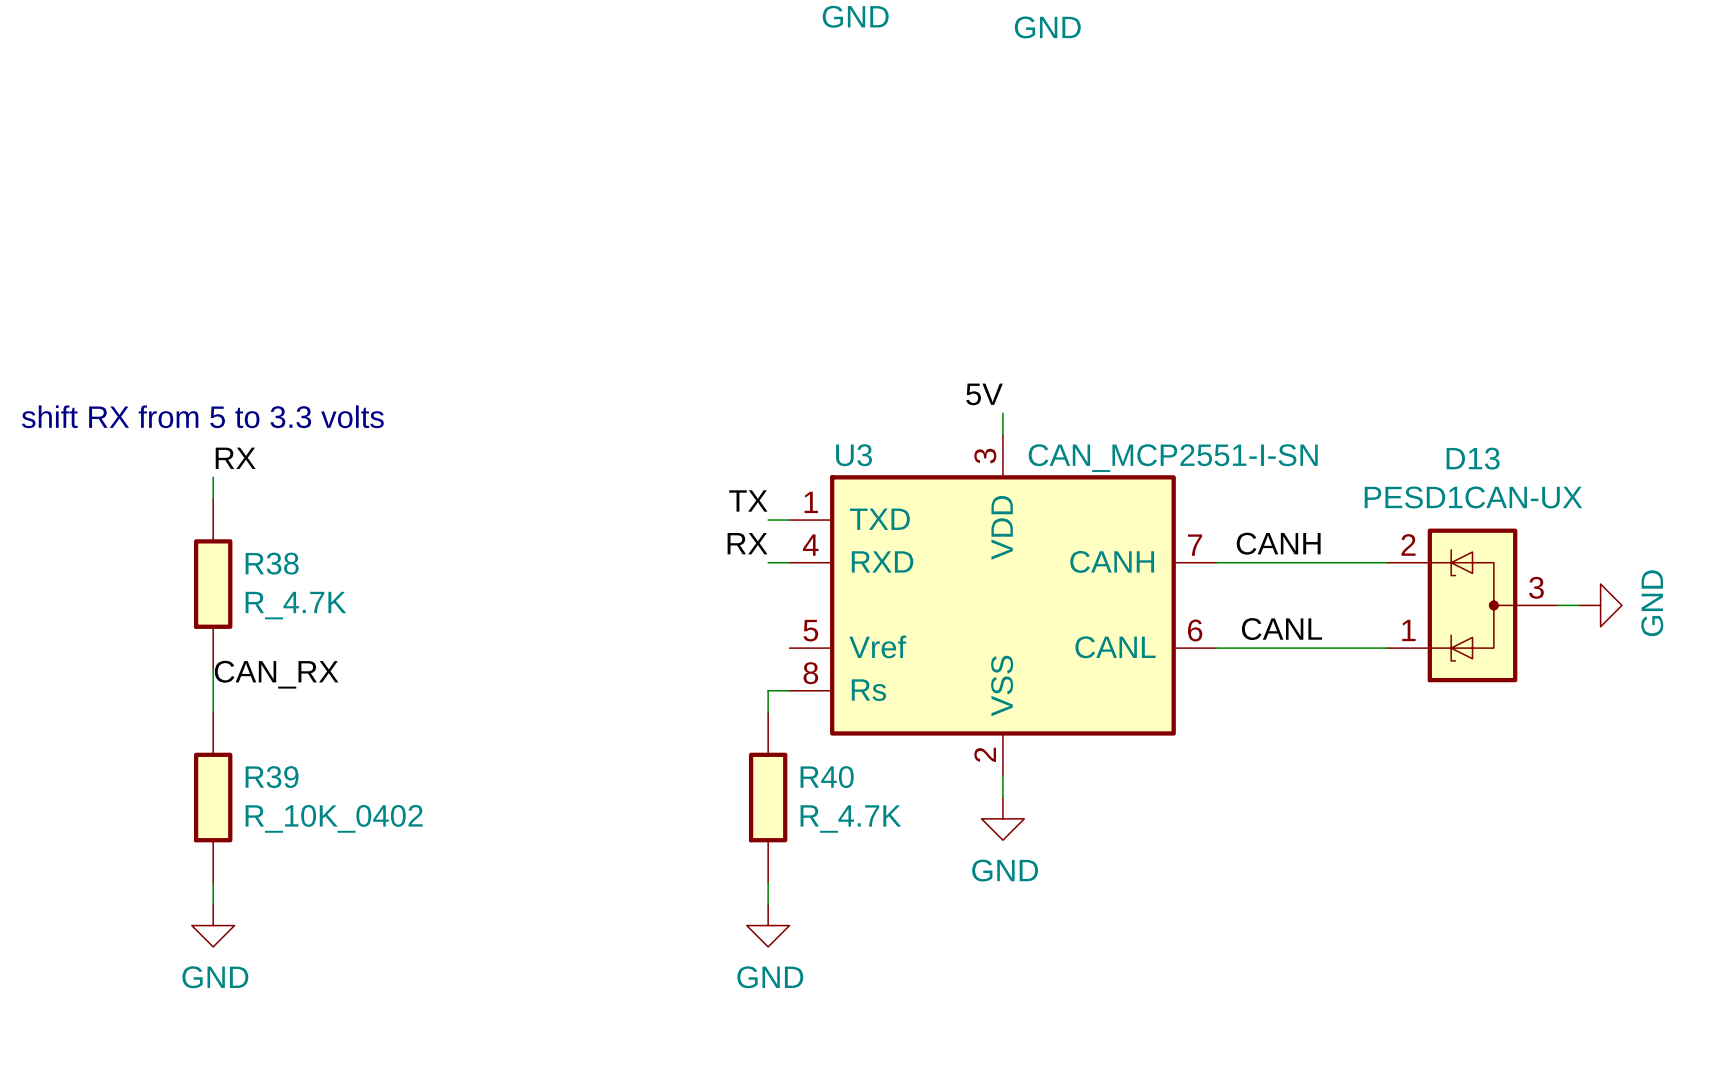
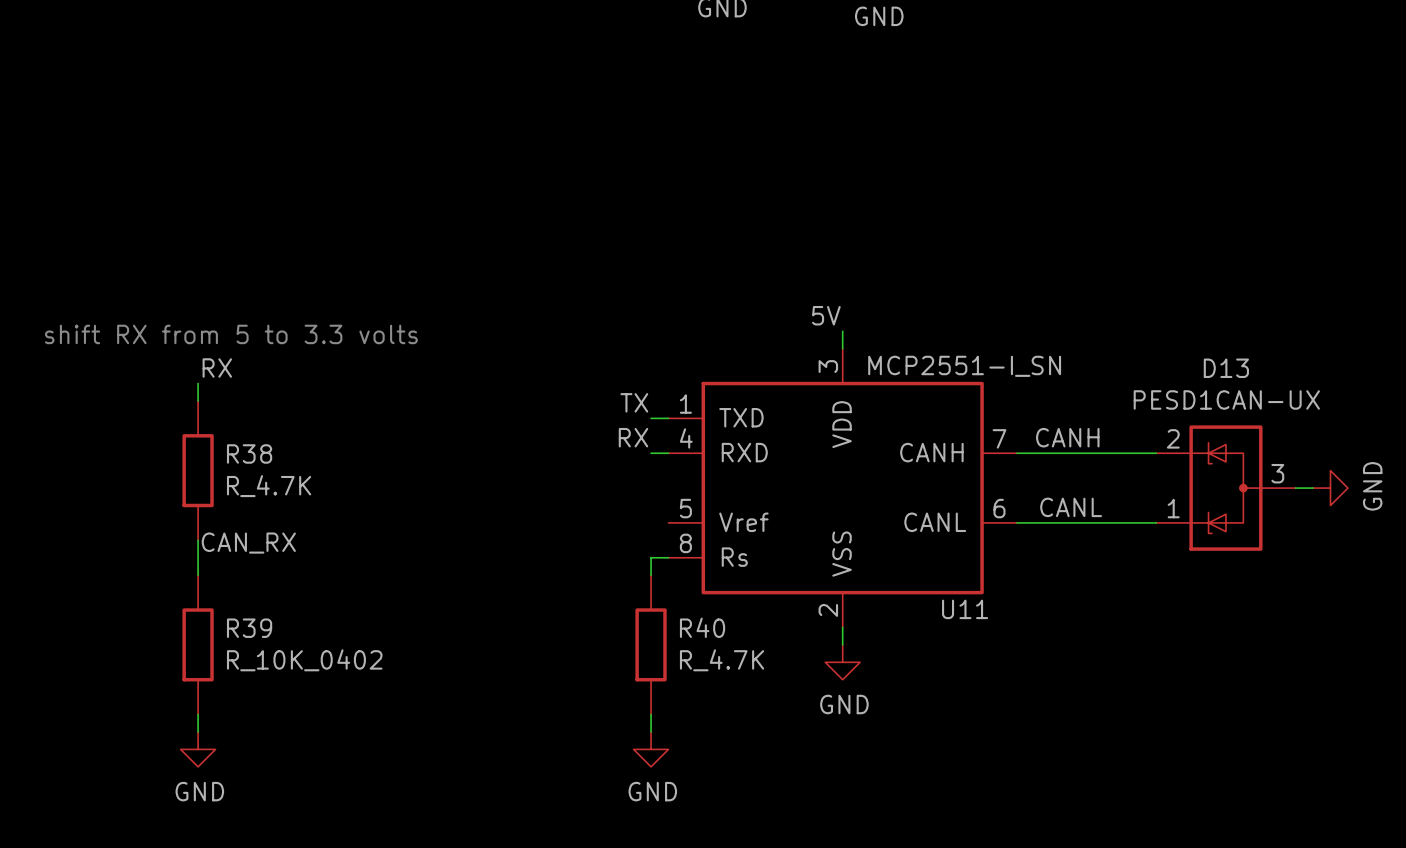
U3 name: U3 (854, 455) -> U11 (965, 609)
U3 value: CAN_MCP2551-I-SN (1173, 458) -> MCP2551-I_SN (964, 366)

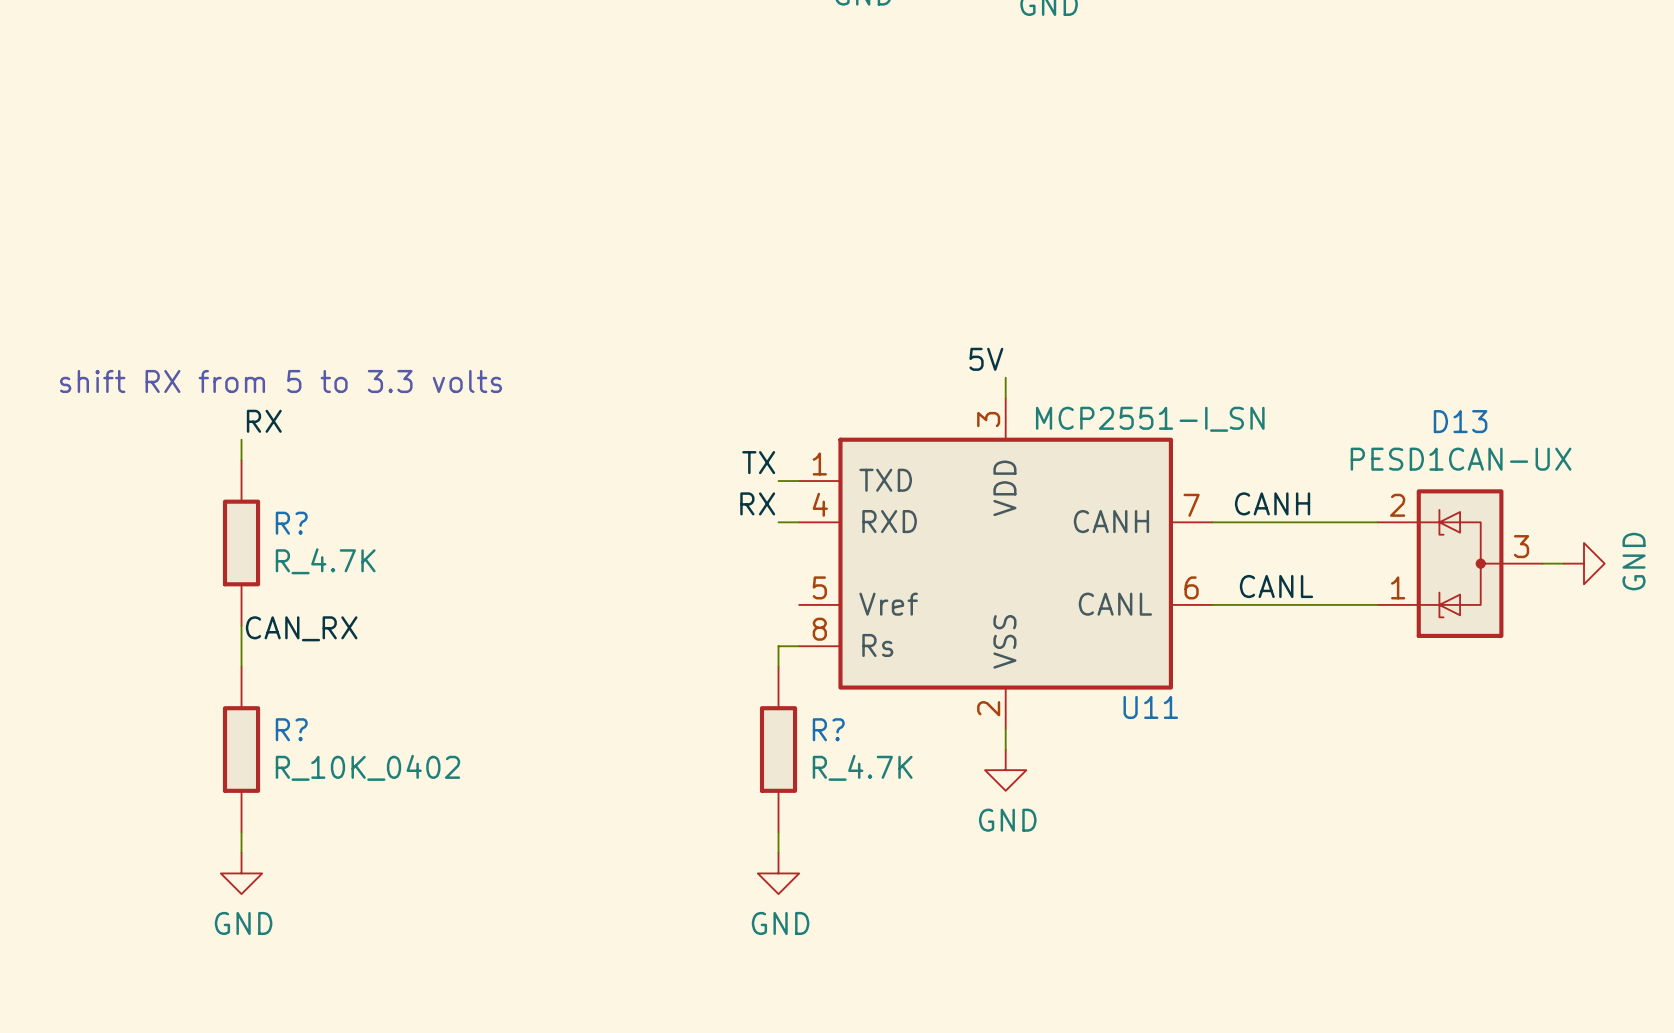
R38 name: R38 (249, 453) -> R? (291, 523)
R40 name: R40 (702, 627) -> R? (828, 729)
R39 name: R39 (249, 628) -> R? (291, 729)

